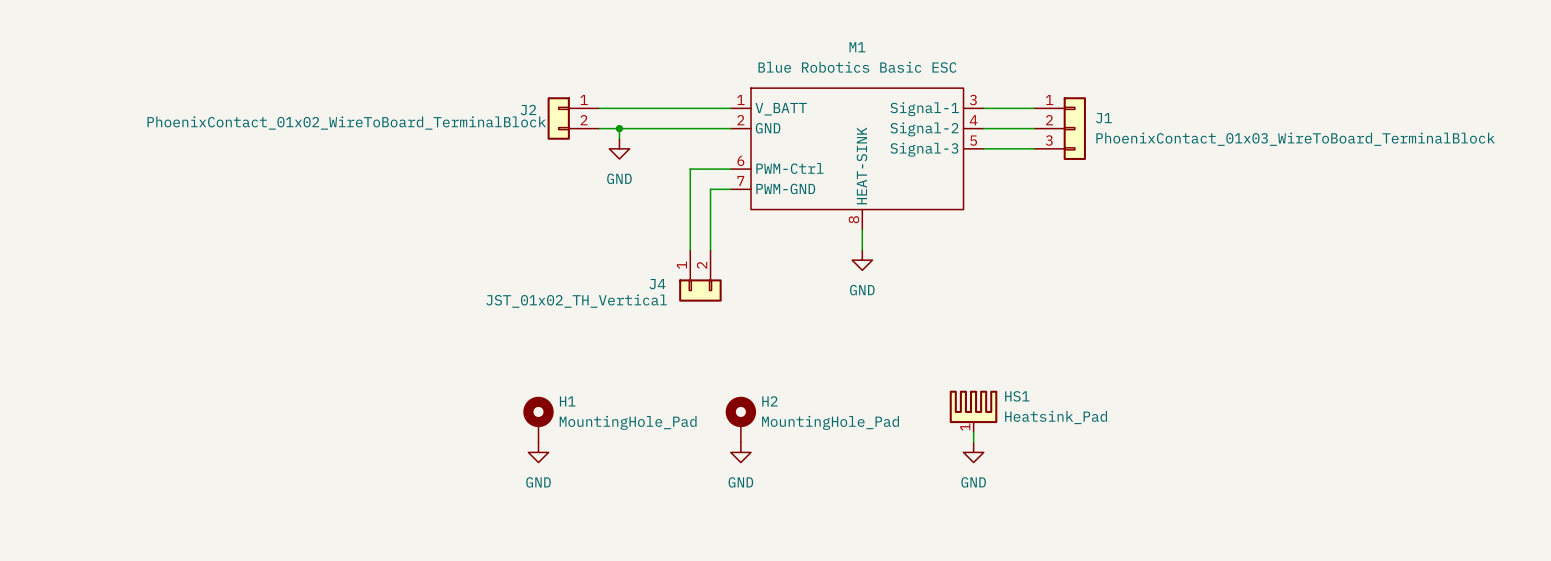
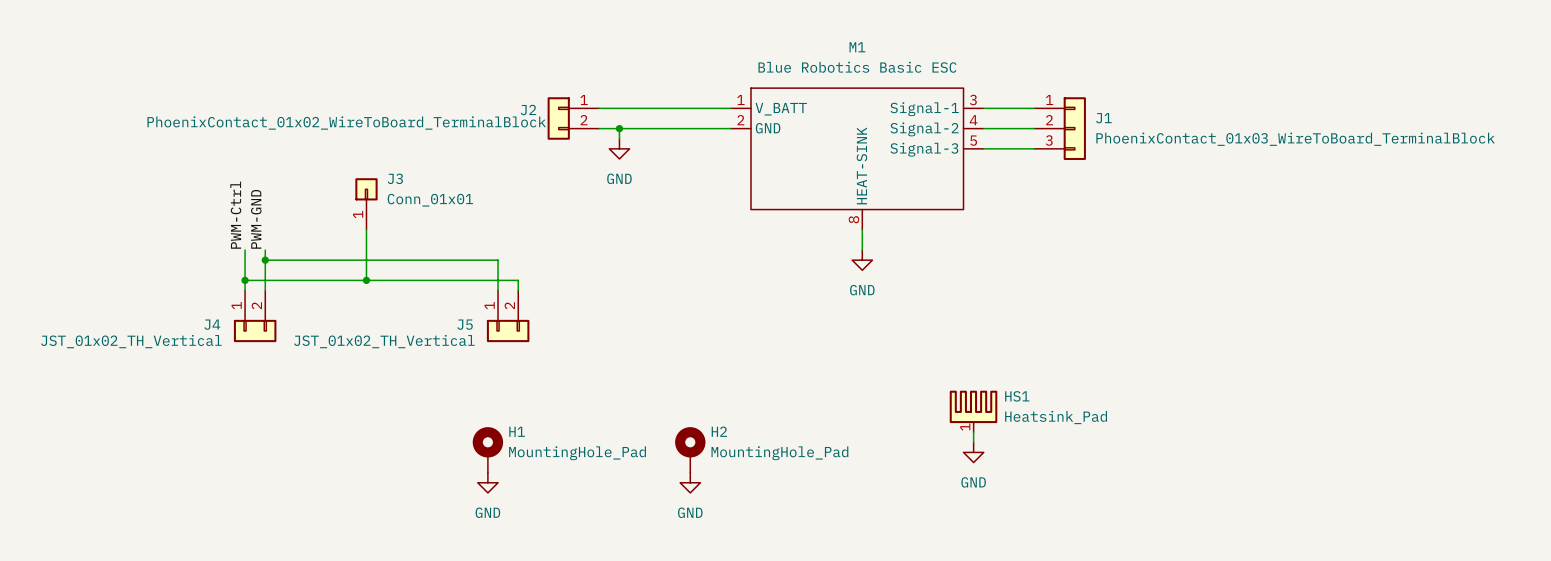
M1 symbol: [730, 88, 984, 230] -> [730, 88, 984, 230]
wire: (730, 169) (690, 169) (690, 250) -> none
wire: (730, 189) (710, 189) (710, 250) -> none
J3: none -> Conn_01x01 (366, 204)
label: none -> PWM-Ctrl (235, 215)
label: none -> PWM-GND (256, 219)
wire: none -> (366, 229) (366, 280)
wire: none -> (245, 250) (245, 290)
wire: none -> (265, 250) (265, 290)
wire: none -> (265, 260) (498, 260) (498, 290)
junction: none -> (265, 260)
J4 position: (700, 275) -> (255, 316)
wire: none -> (245, 280) (518, 280) (518, 290)
junction: none -> (245, 280)
junction: none -> (366, 280)
J5: none -> JST_01x02_TH_Vertical (508, 316)
H1 position: (538, 419) -> (487, 449)
H2 position: (740, 419) -> (690, 449)
power symbol position: GND (538, 452) -> GND (487, 482)
power symbol position: GND (740, 452) -> GND (690, 482)

